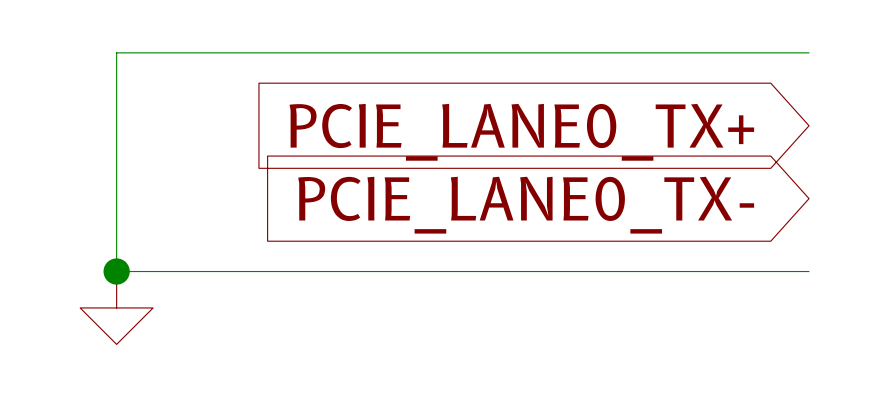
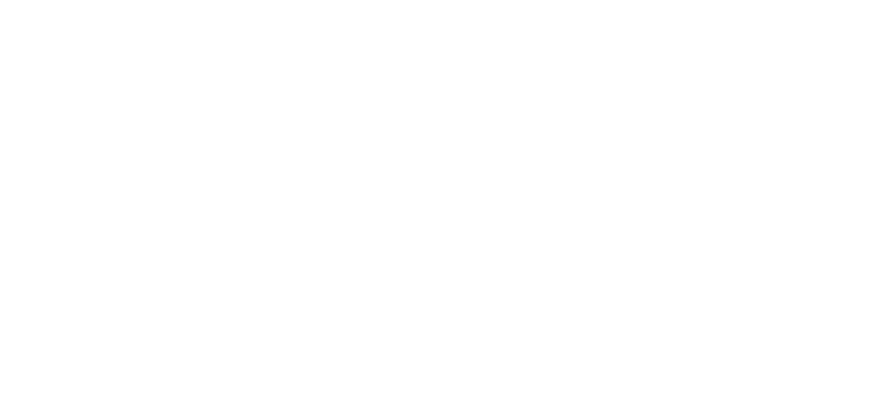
wire: (809, 52) (116, 52) (116, 271) (809, 271) -> none
global label: PCIE_LANE0_TX+ (521, 132) -> none
global label: PCIE_LANE0_TX- (526, 205) -> none
junction: (116, 271) -> none
power symbol: (116, 307) -> none

